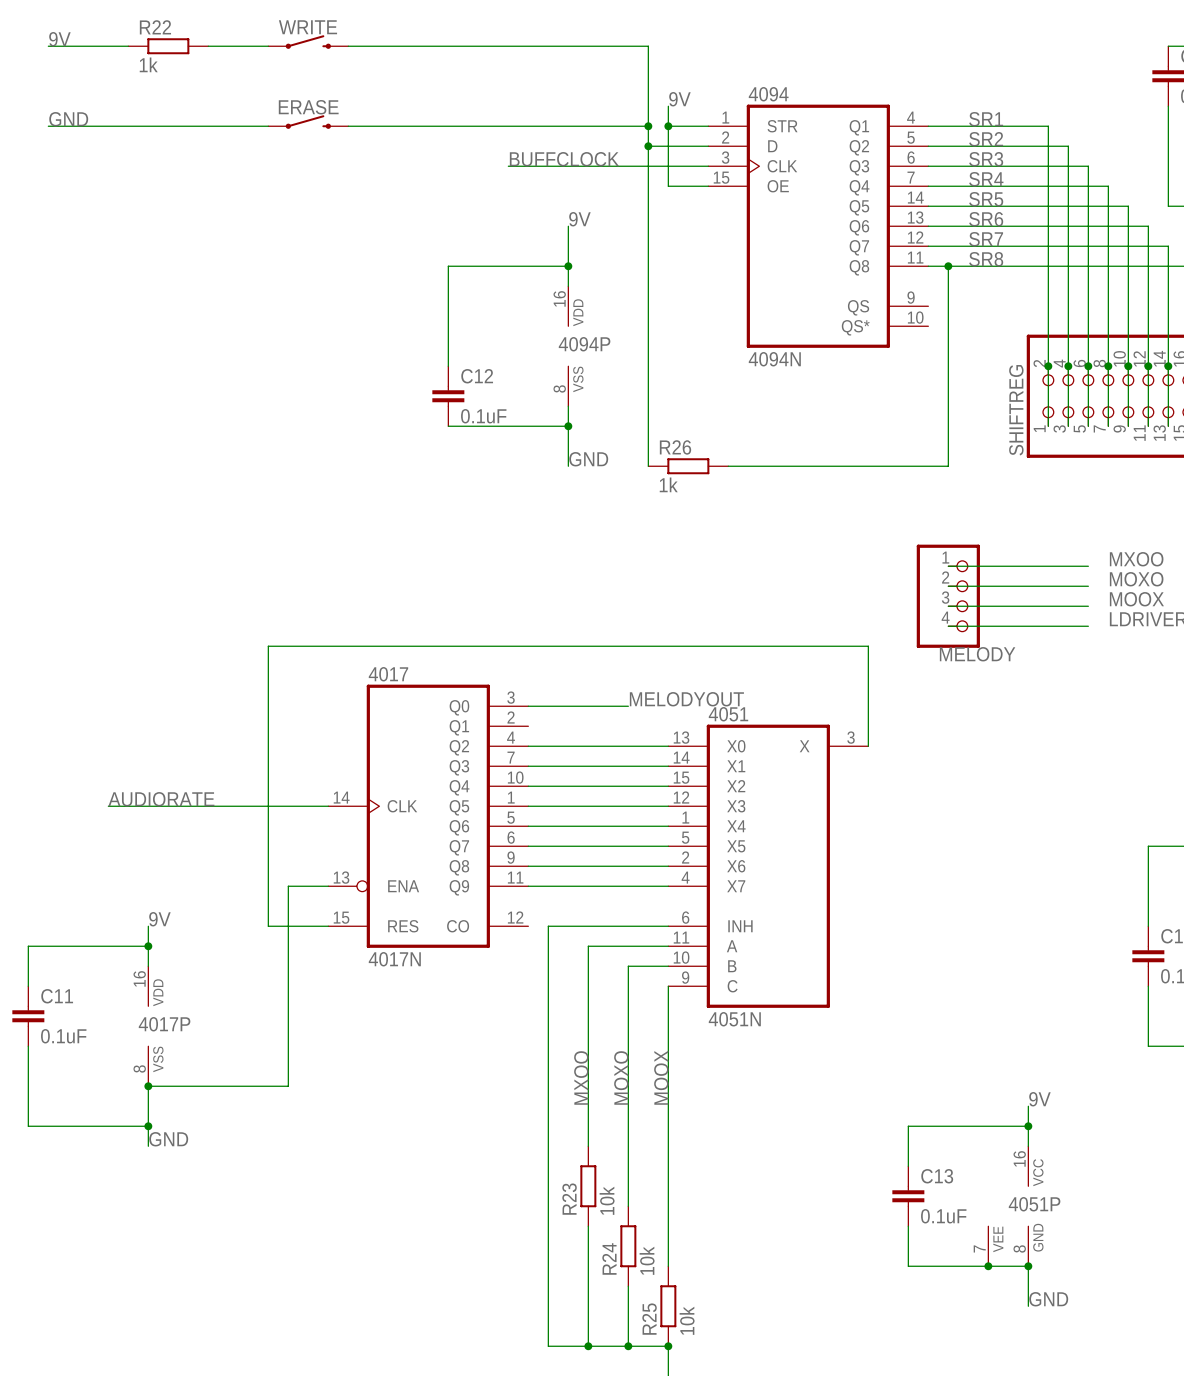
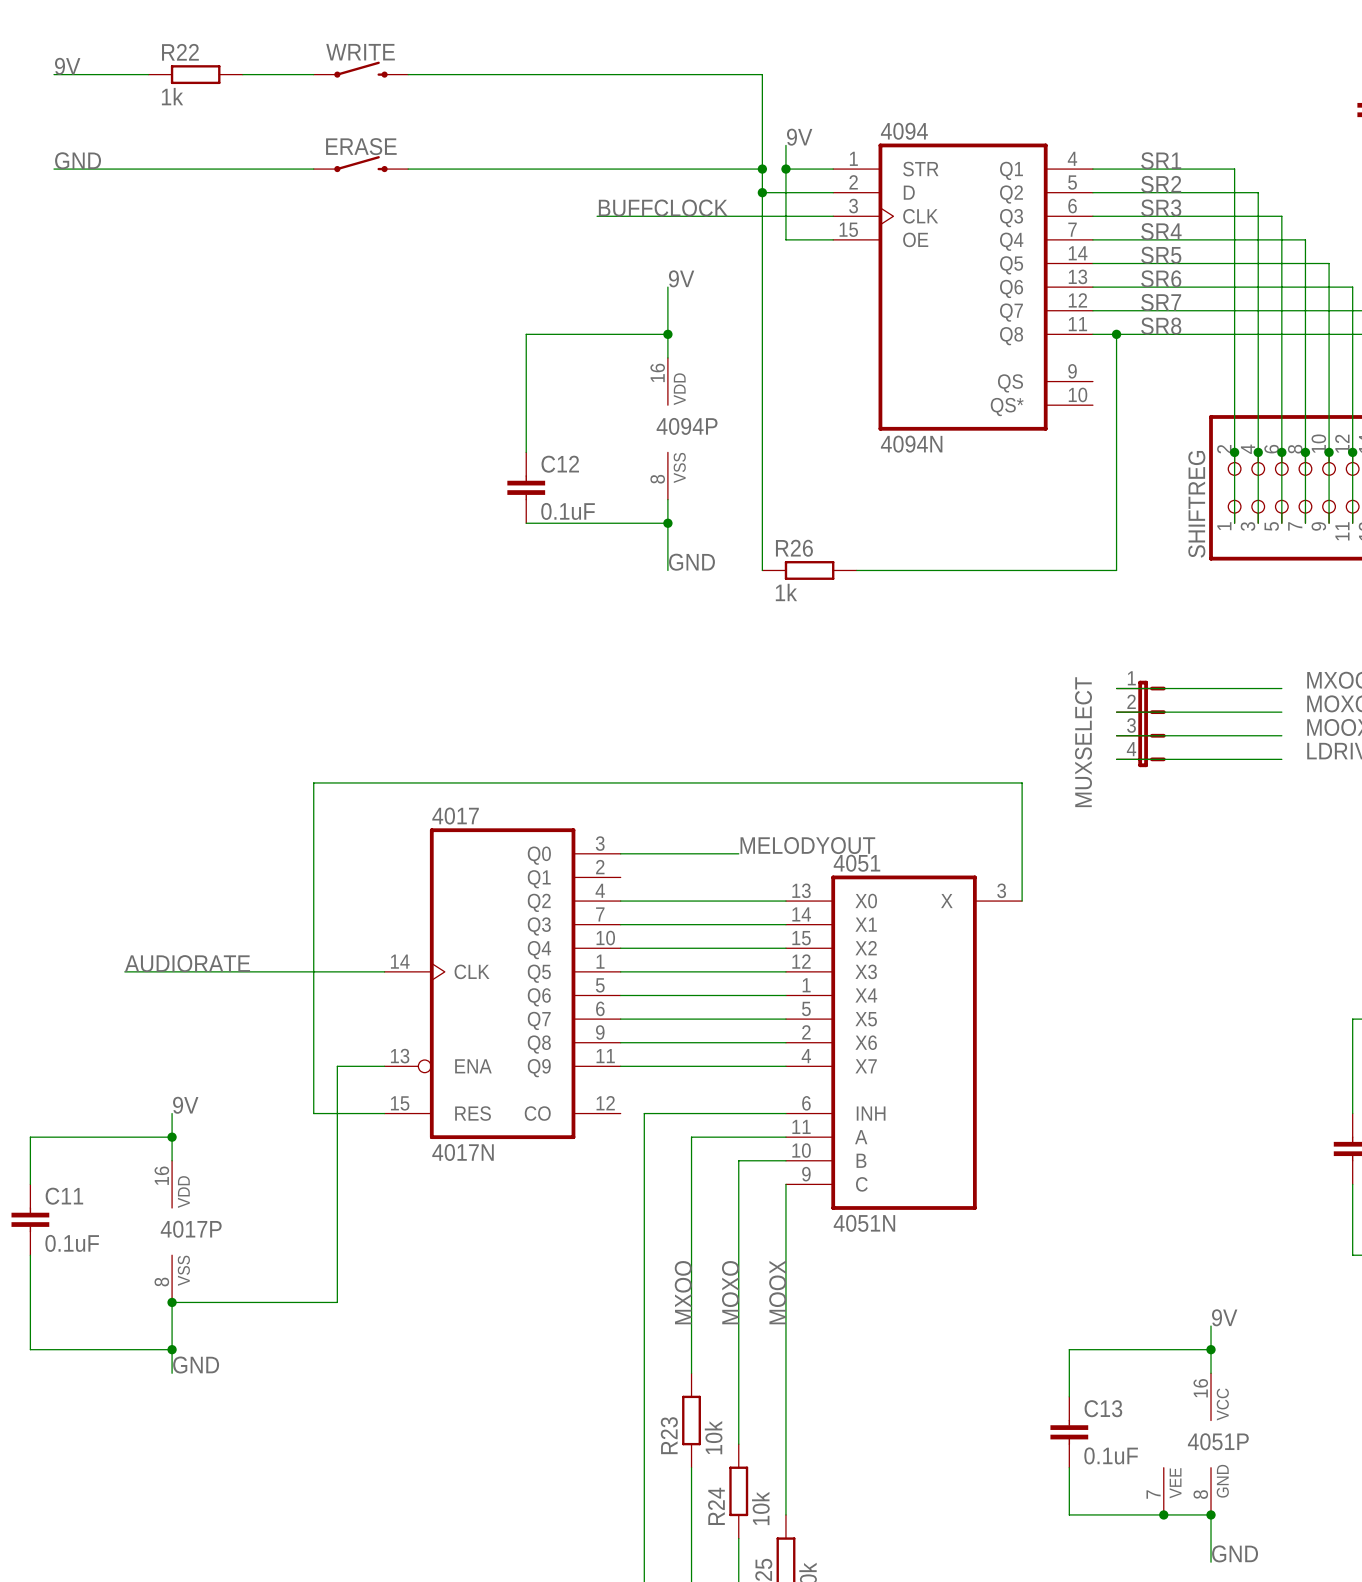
MELODY: (948, 596) -> none
MUXSELECT: none -> (1141, 723)

